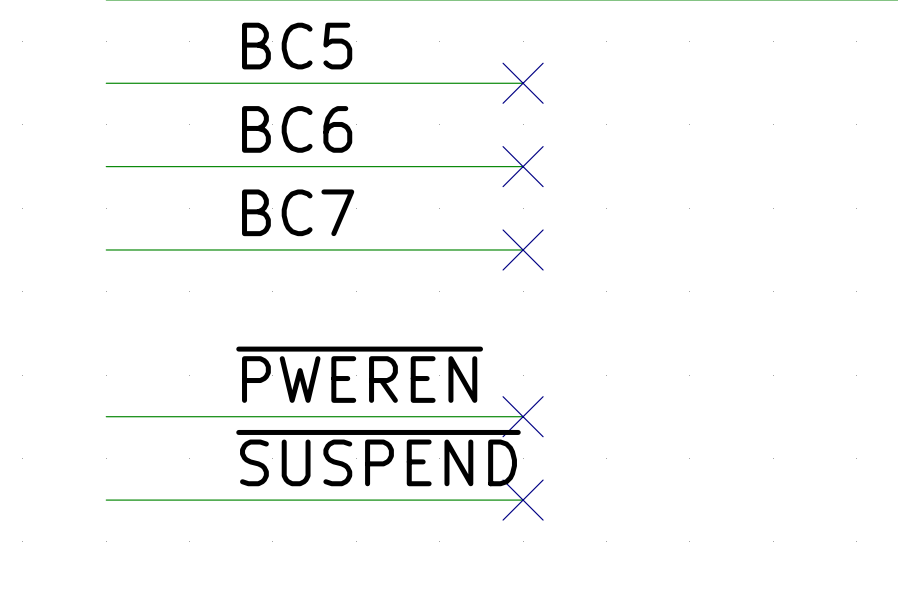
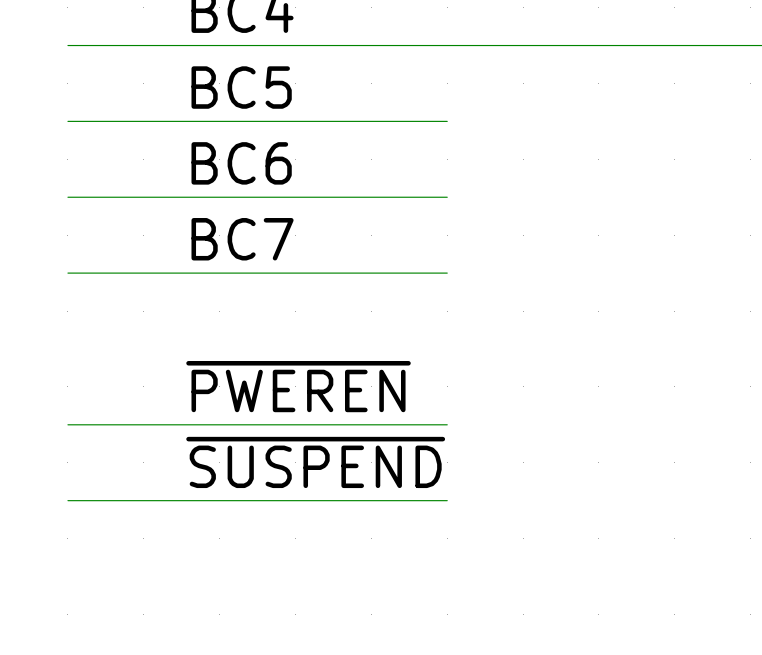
no-connect mark: (523, 83) -> none
no-connect mark: (523, 166) -> none
no-connect mark: (523, 249) -> none
no-connect mark: (523, 416) -> none
no-connect mark: (523, 500) -> none

